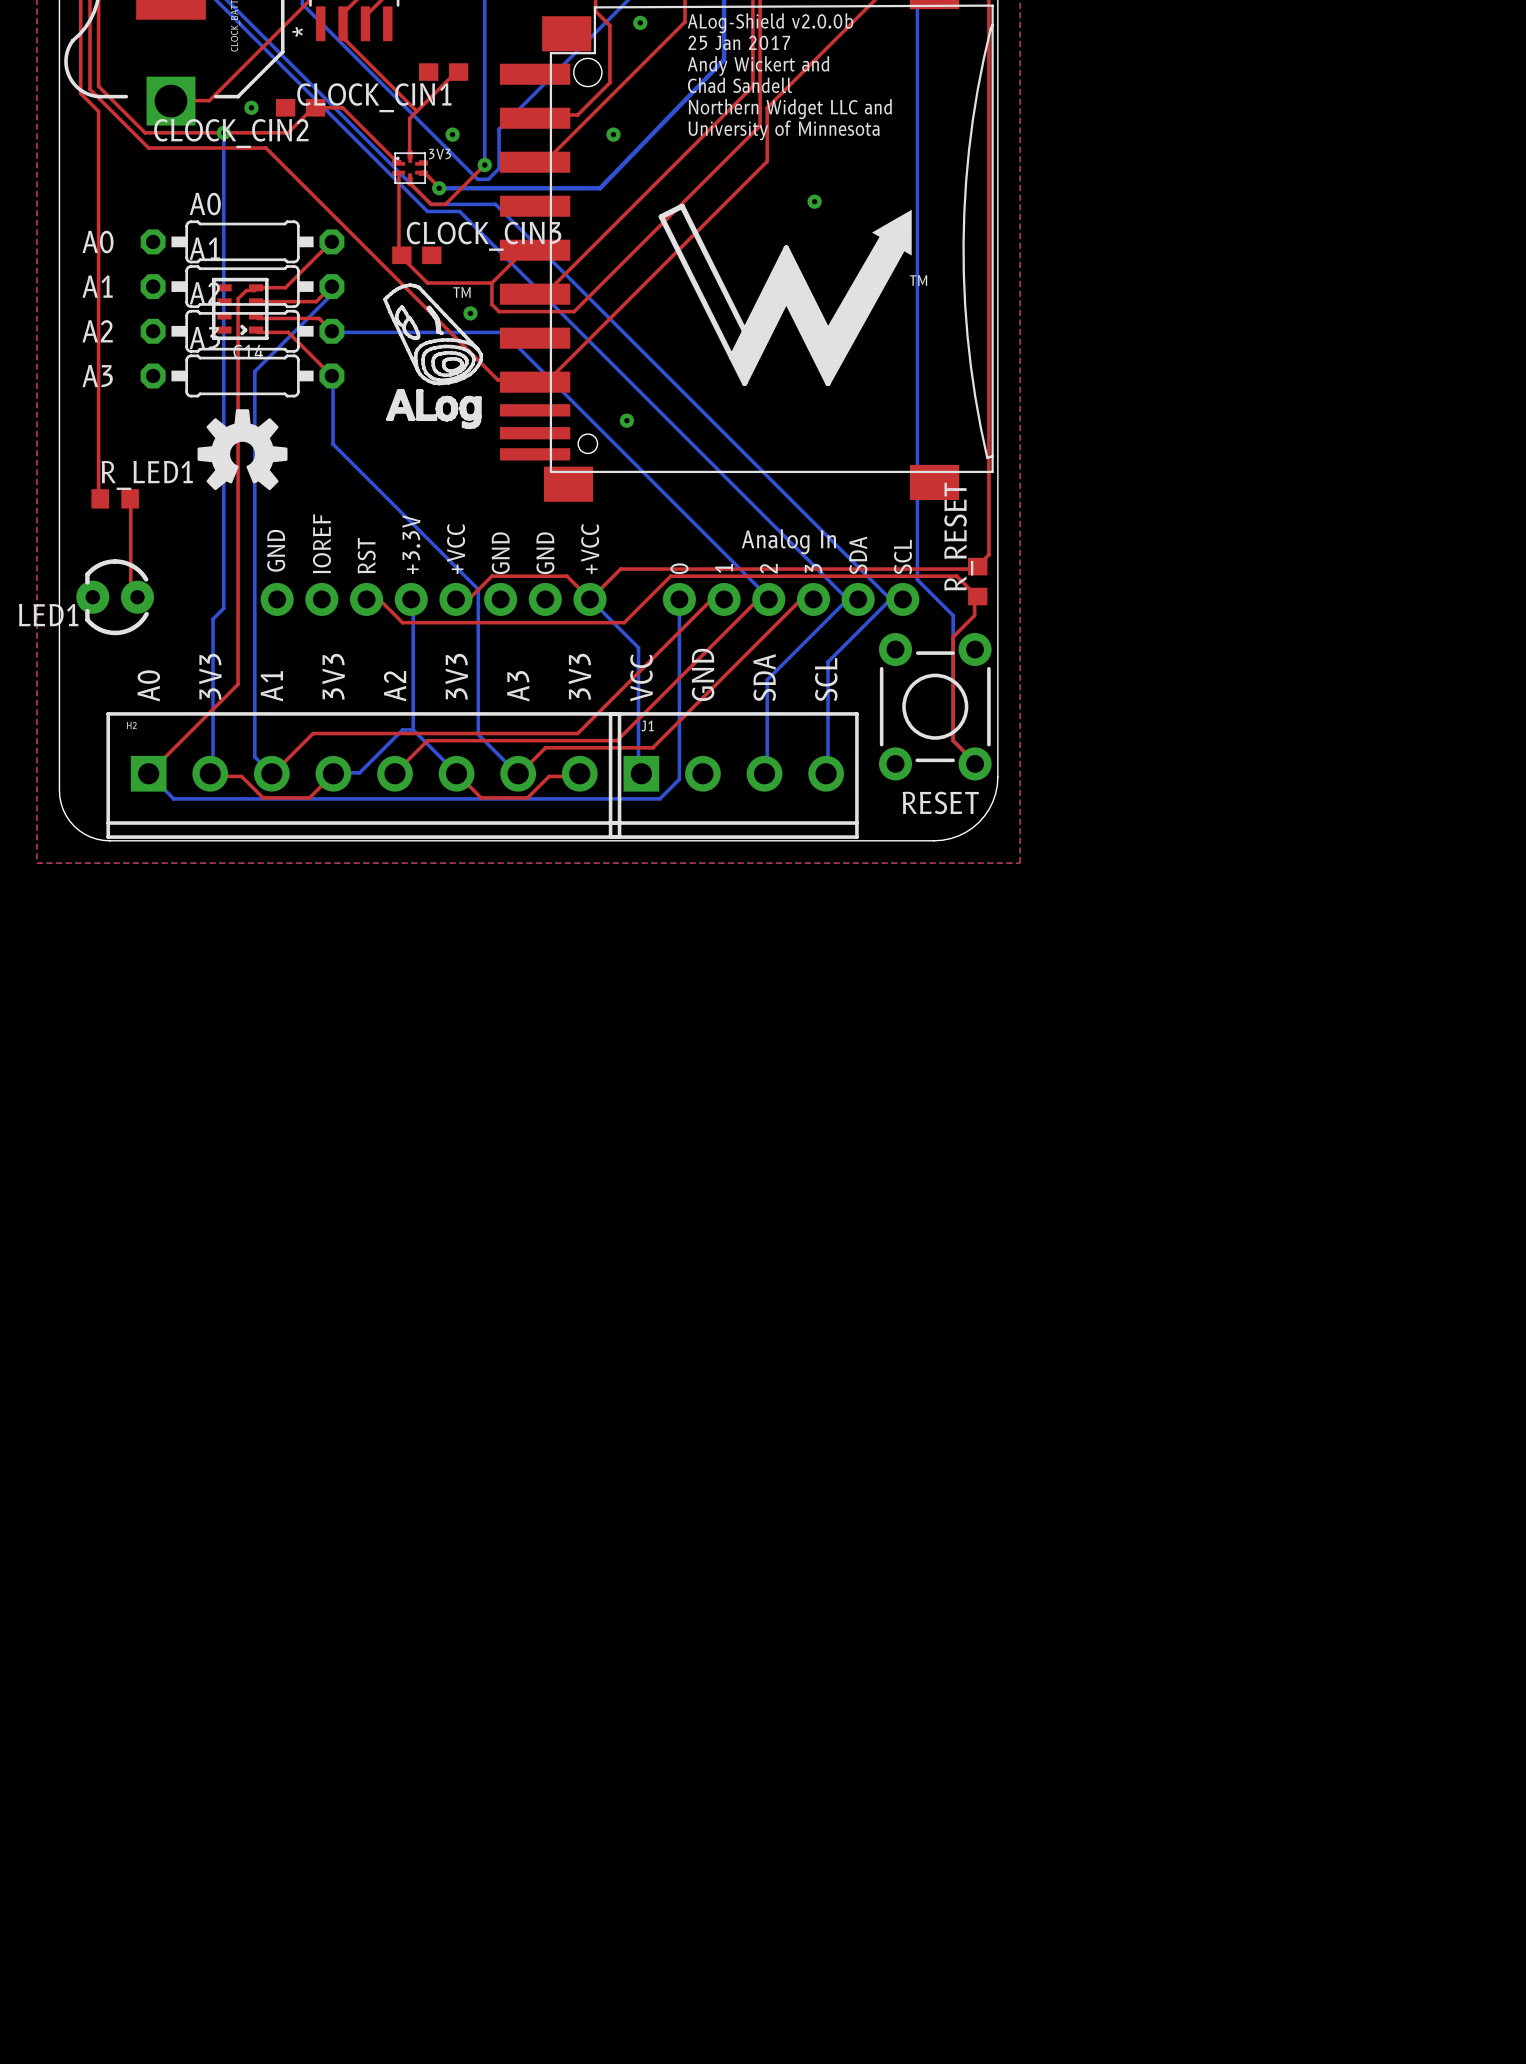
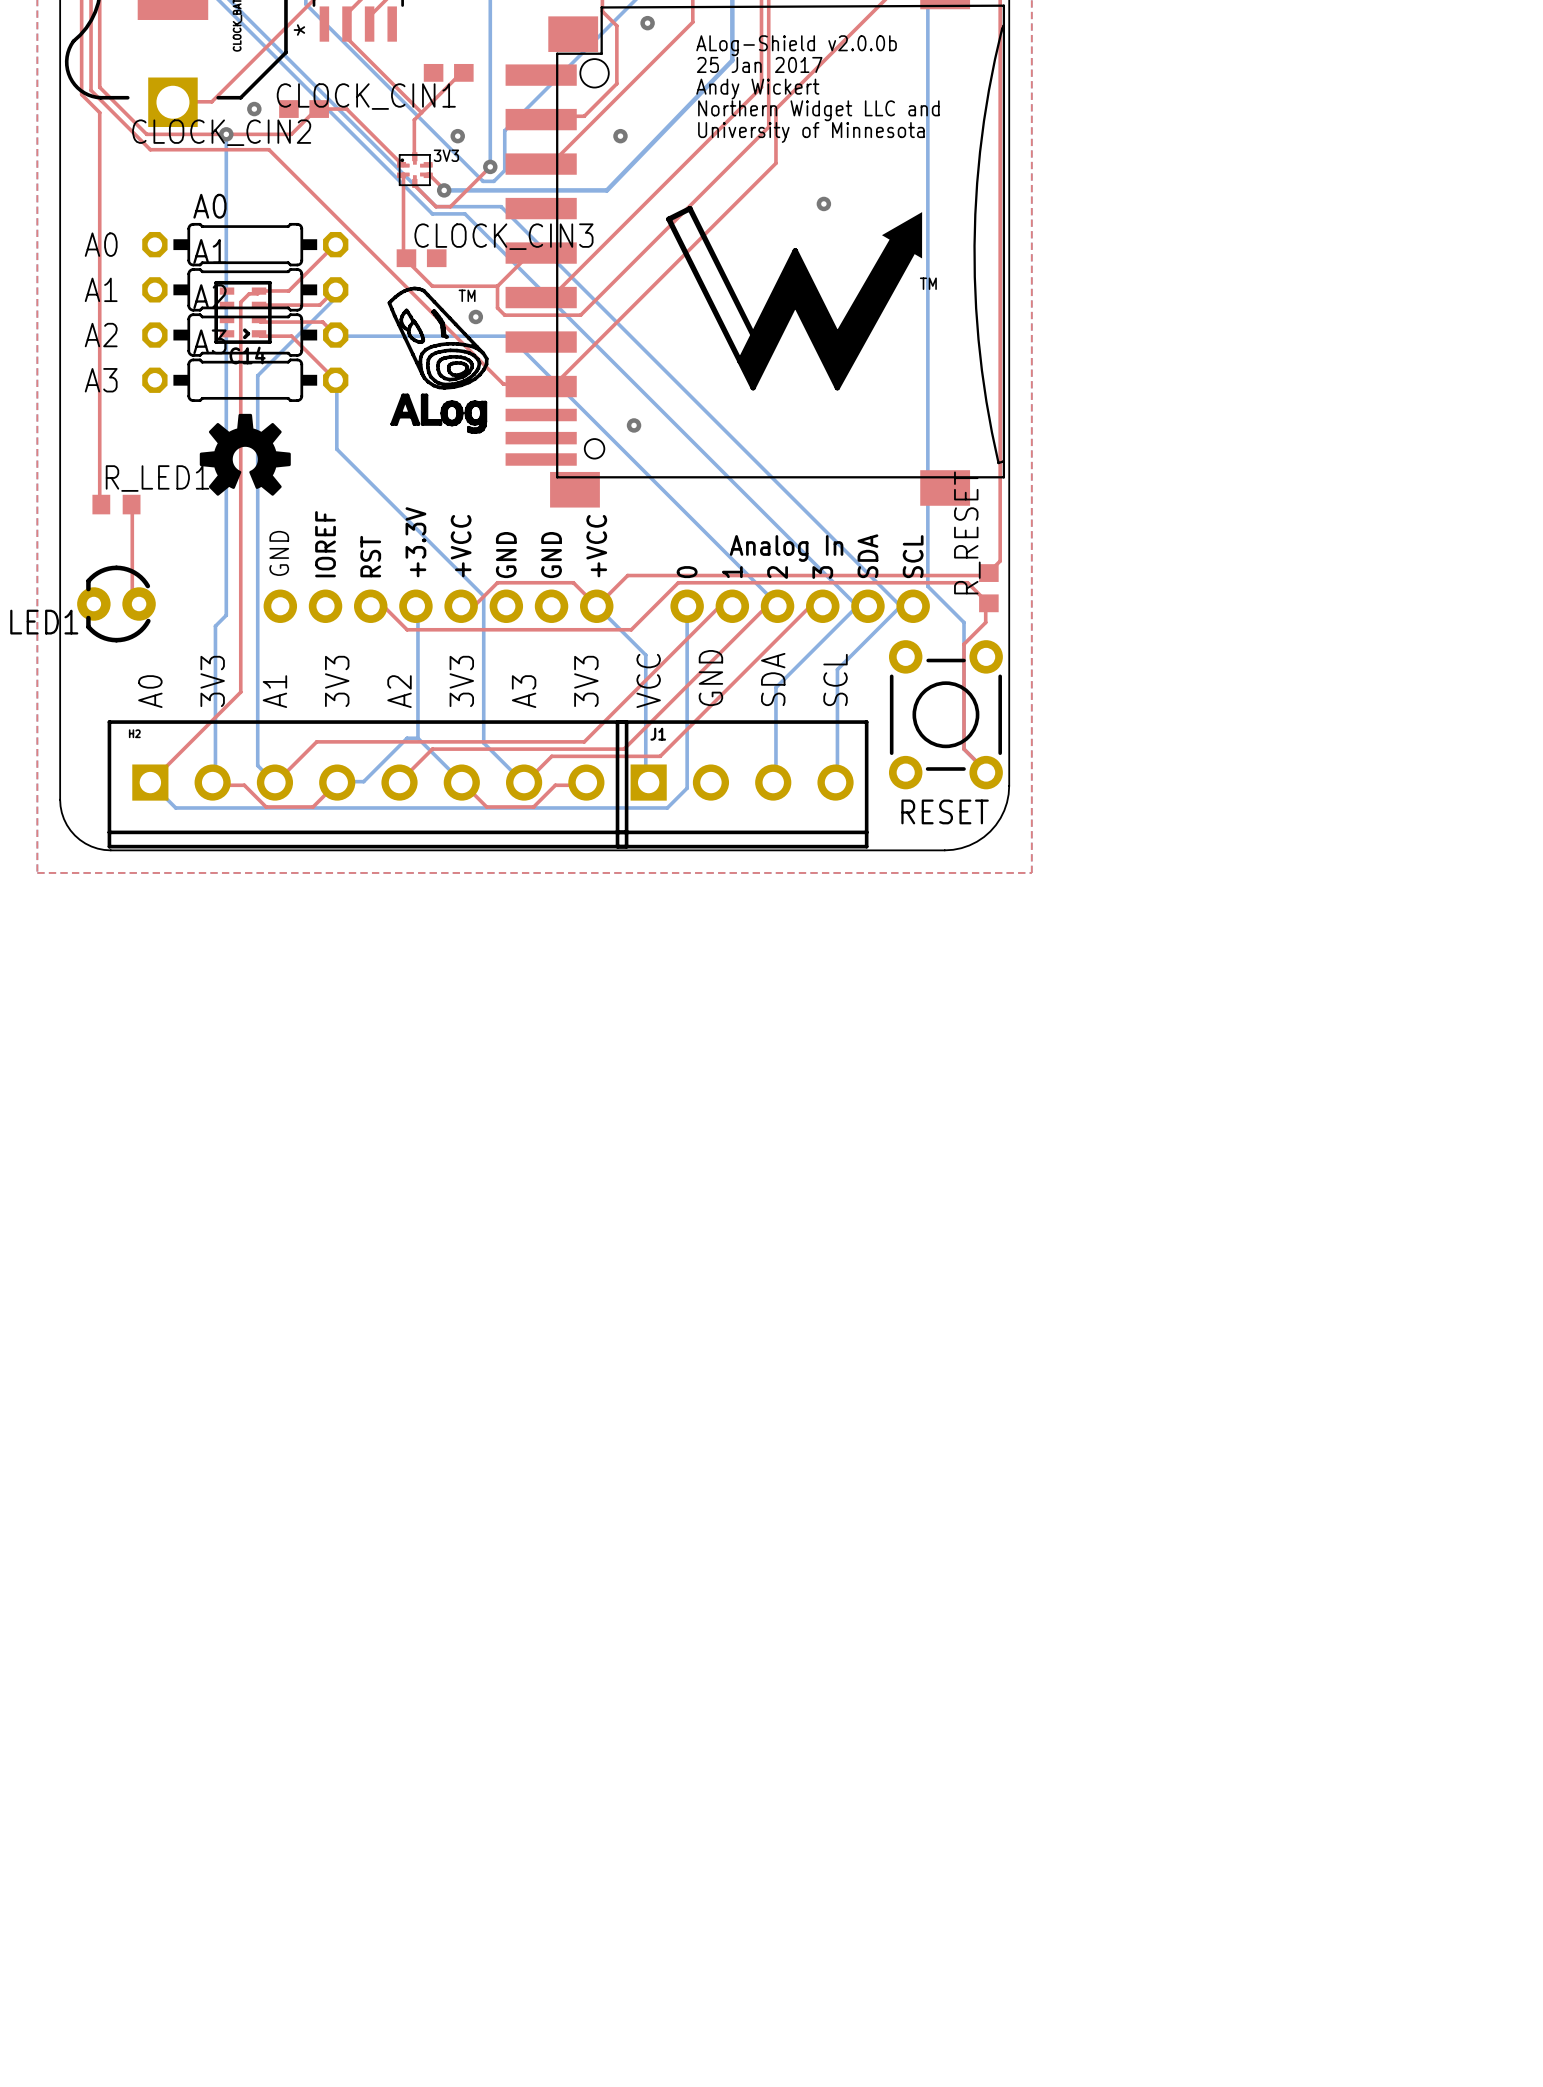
text: ALog-Shield v2.0.0b (770, 23) -> none
text: 25 Jan 2017 (739, 42) -> ALog-Shield v2.0.0b (796, 45)
text: Andy Wickert and (758, 66) -> 25 Jan 2017 (759, 64)
text: Chad Sandell (739, 85) -> Andy Wickert (757, 89)

